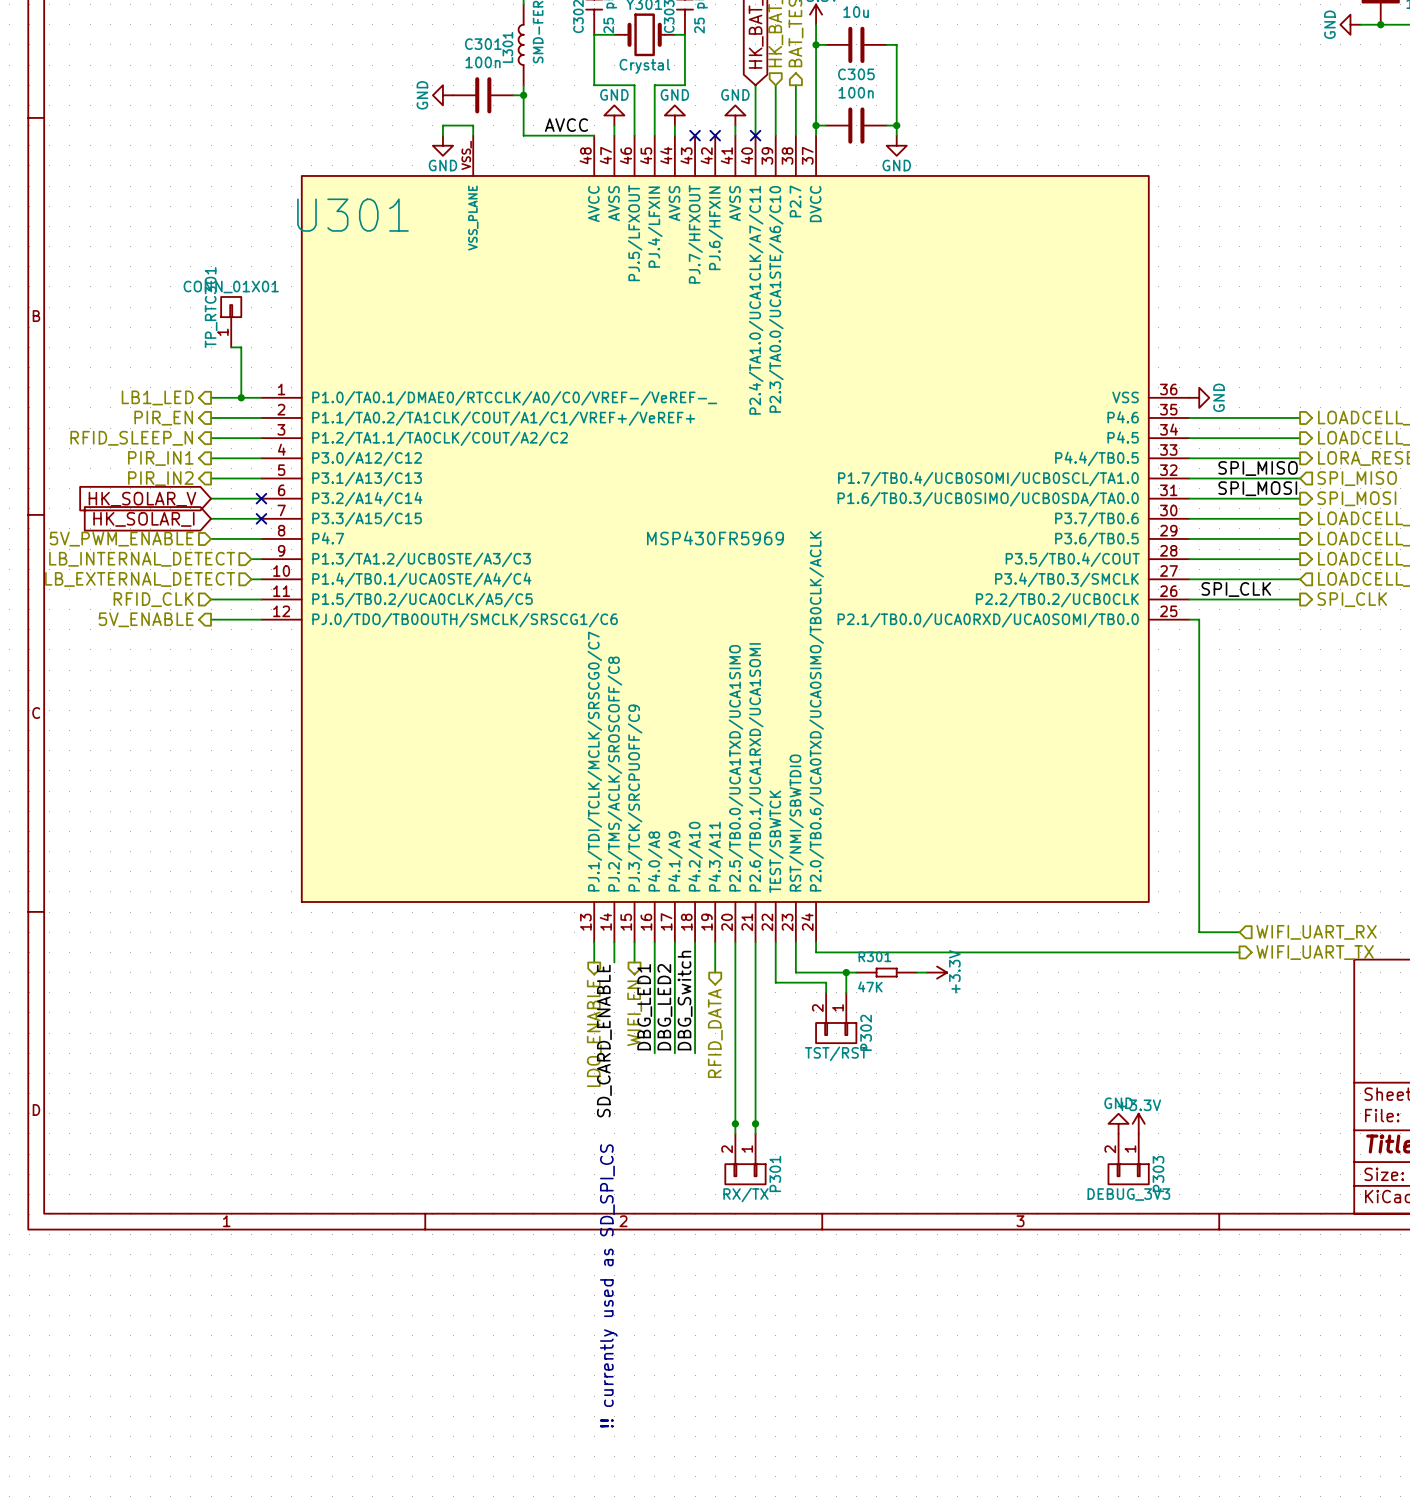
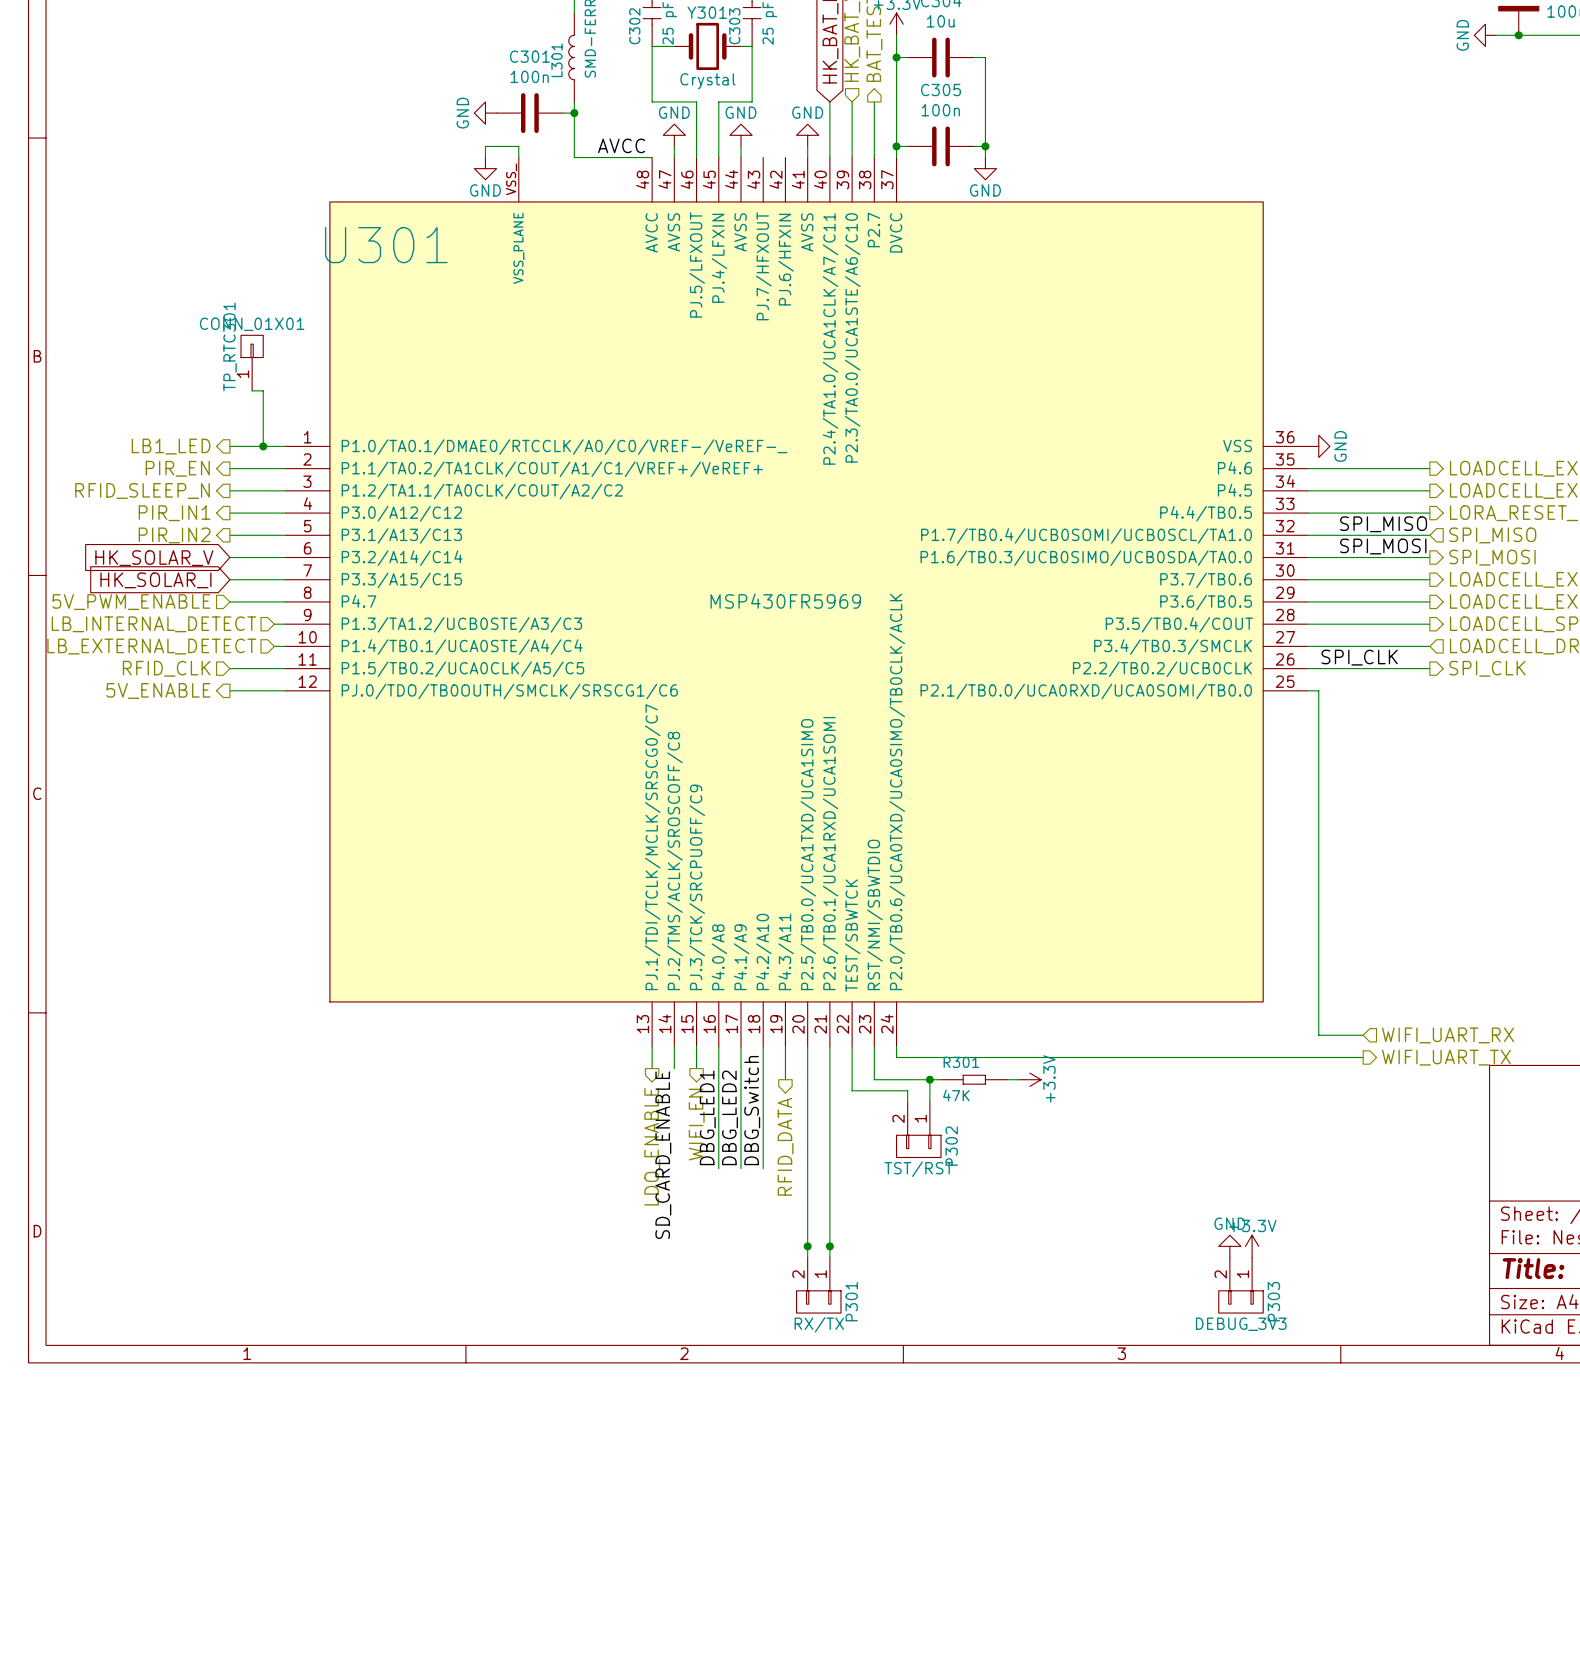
no-connect mark: (695, 135) -> none
no-connect mark: (715, 135) -> none
no-connect mark: (755, 135) -> none
no-connect mark: (261, 498) -> none
no-connect mark: (261, 518) -> none
text: !! currently used as SD_SPI_CS (608, 1285) -> none

